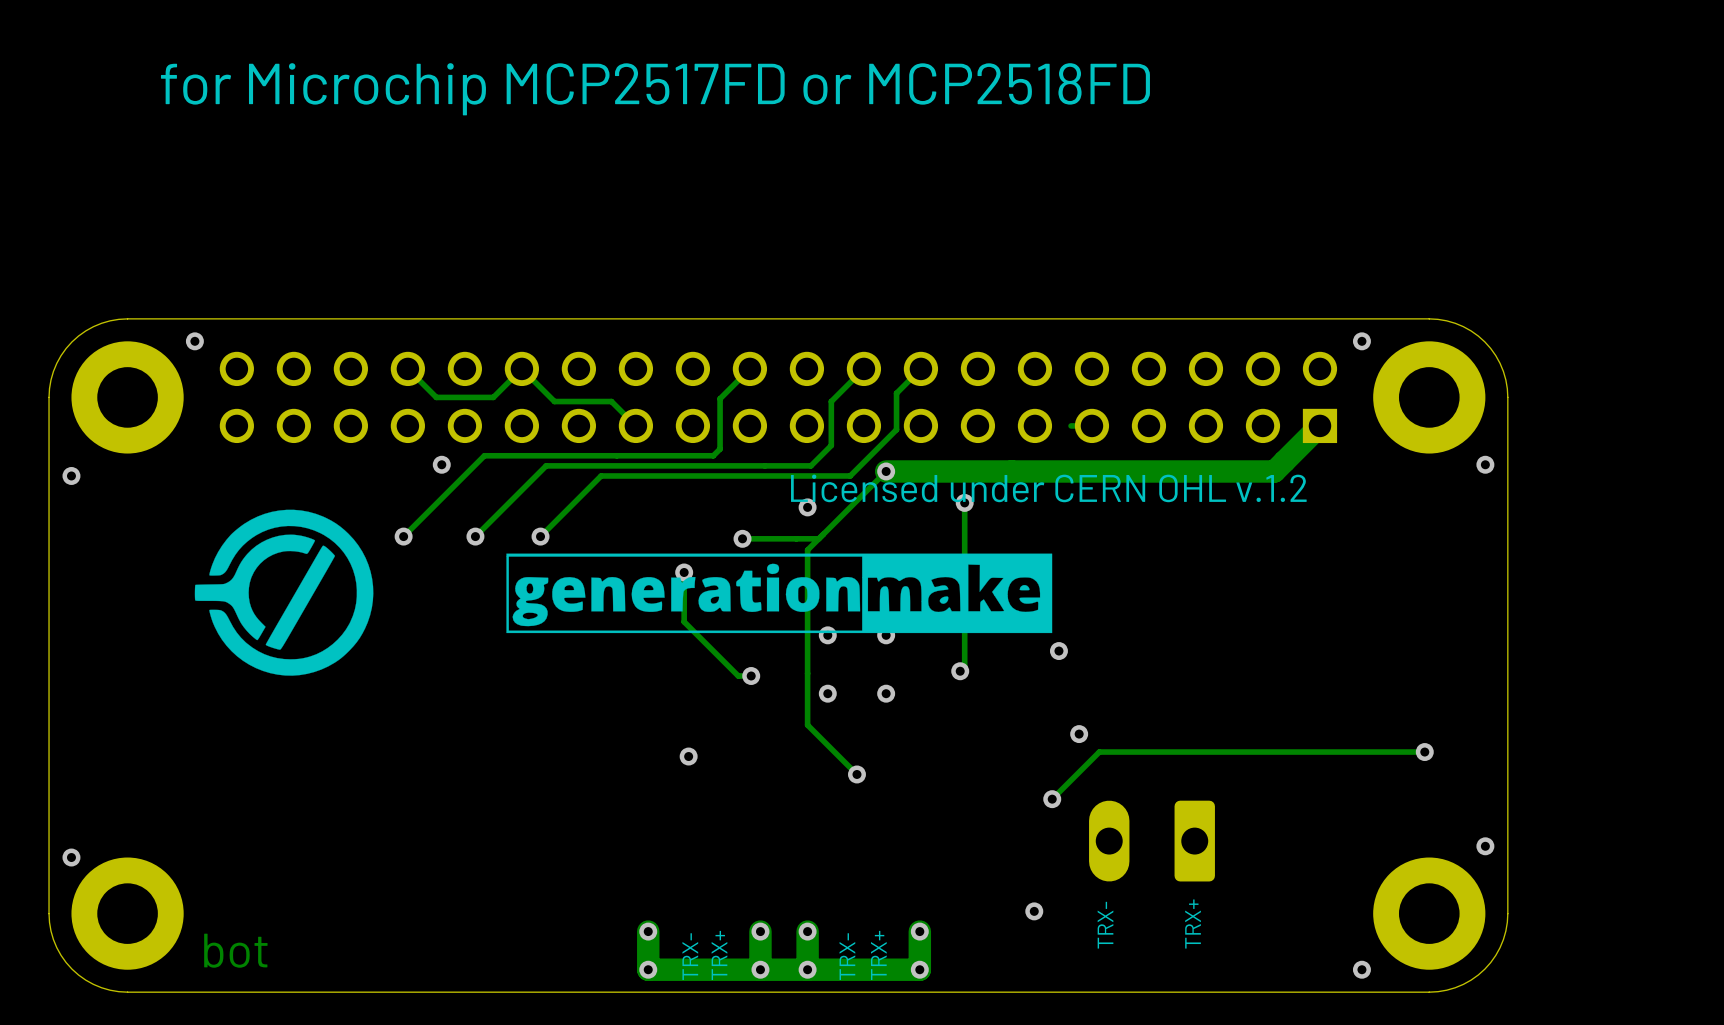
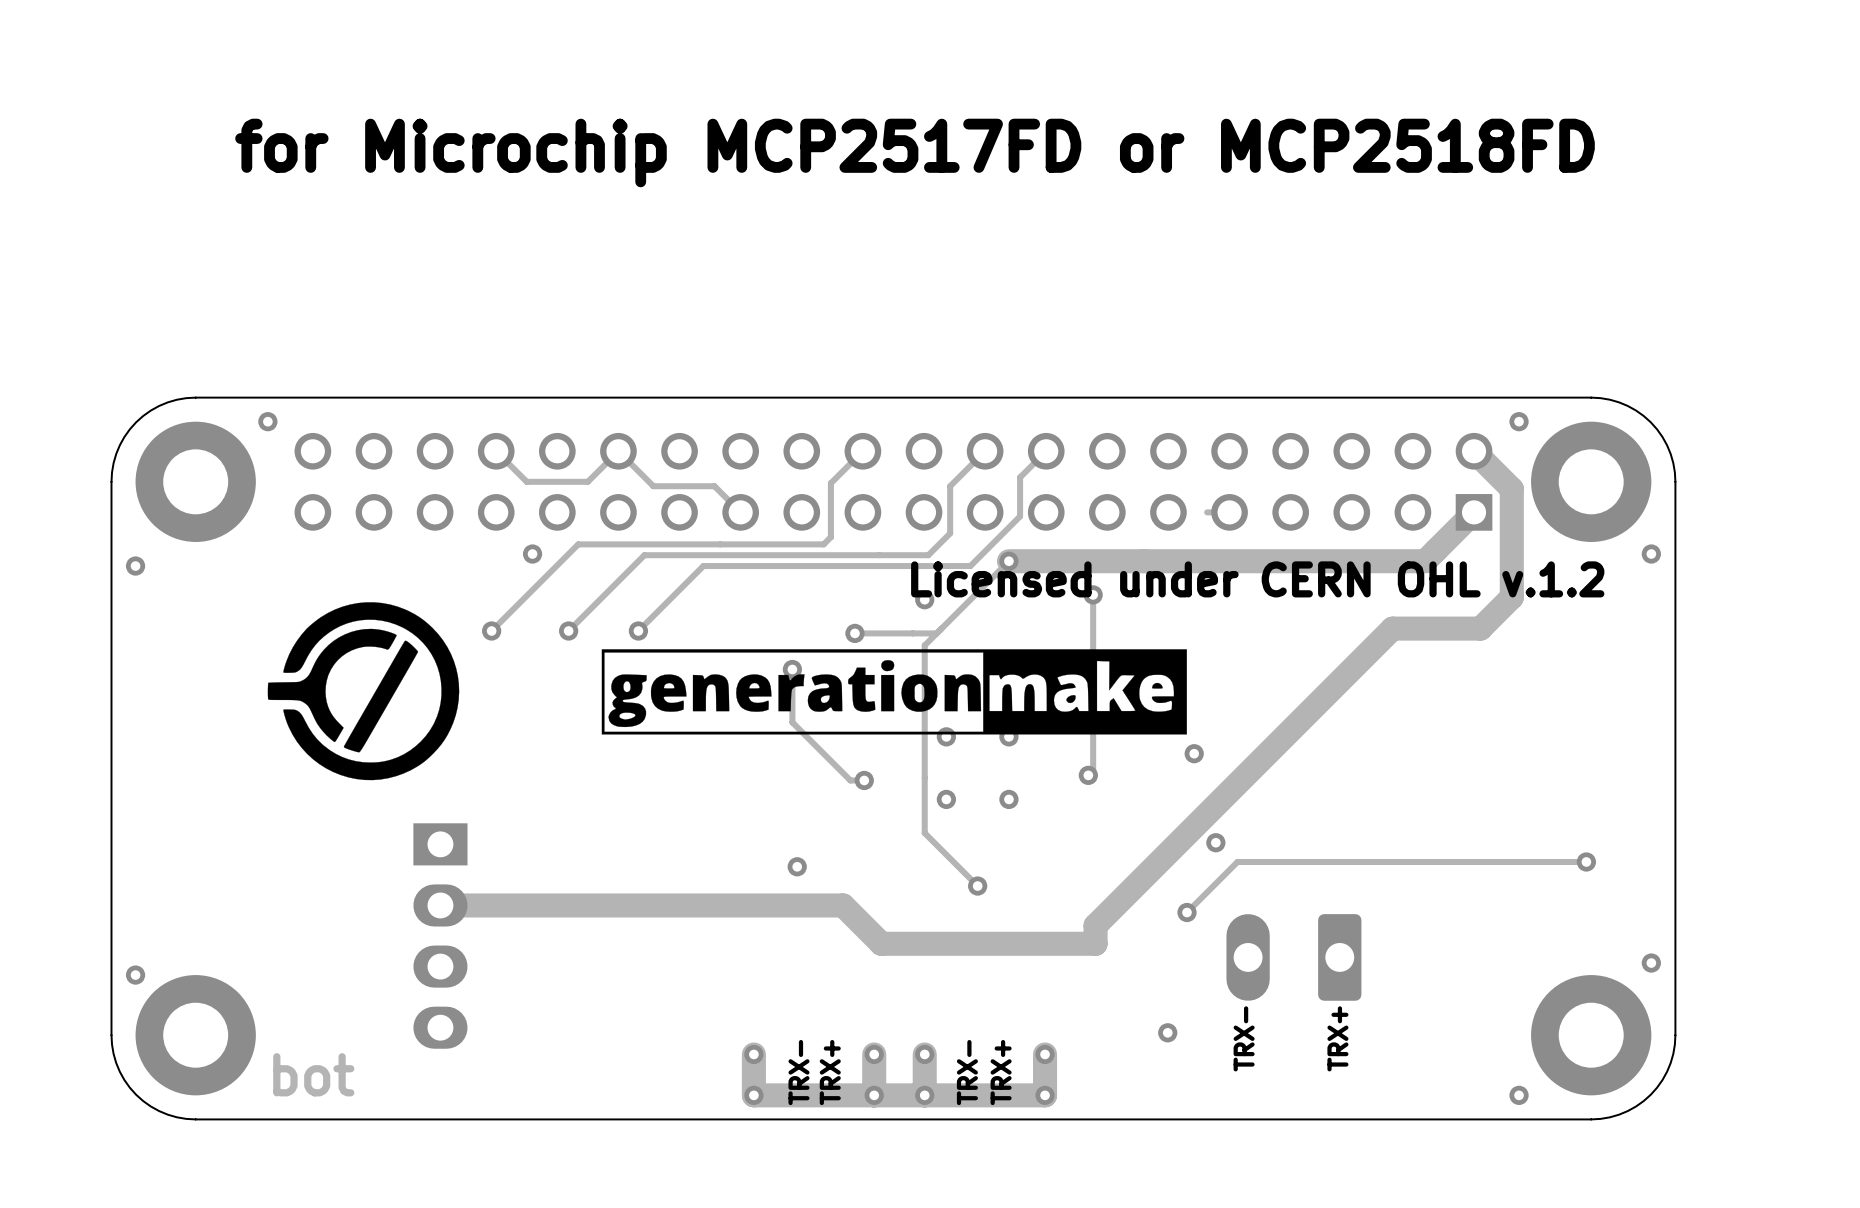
track: none -> (1474, 451) (1511, 489) (1511, 597) (1480, 628) (1392, 628) (1095, 925) (1095, 943) (881, 943) (843, 905) (440, 905)
part: none -> (440, 936)

